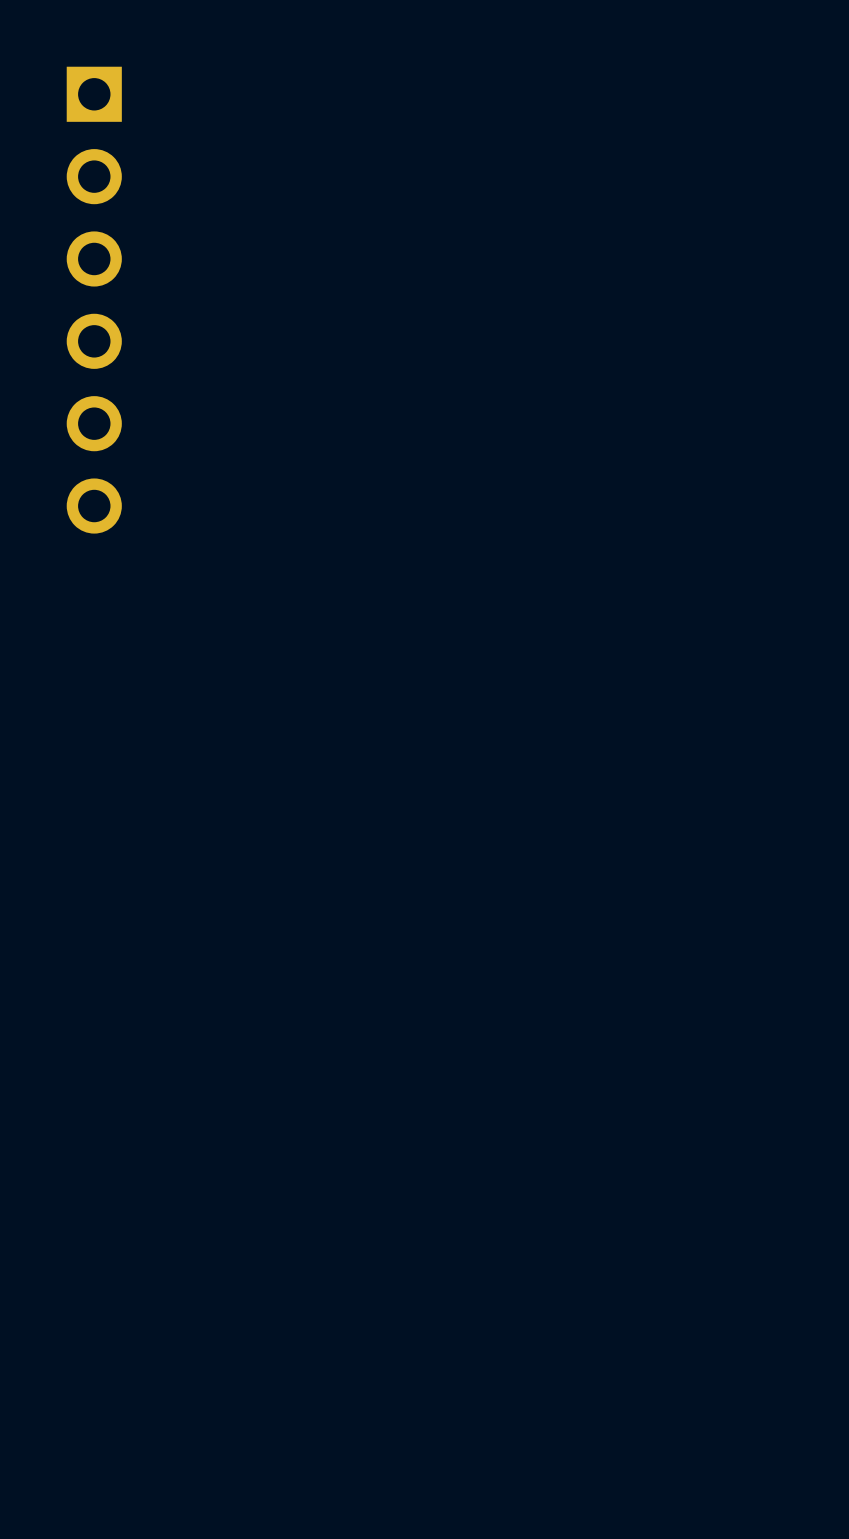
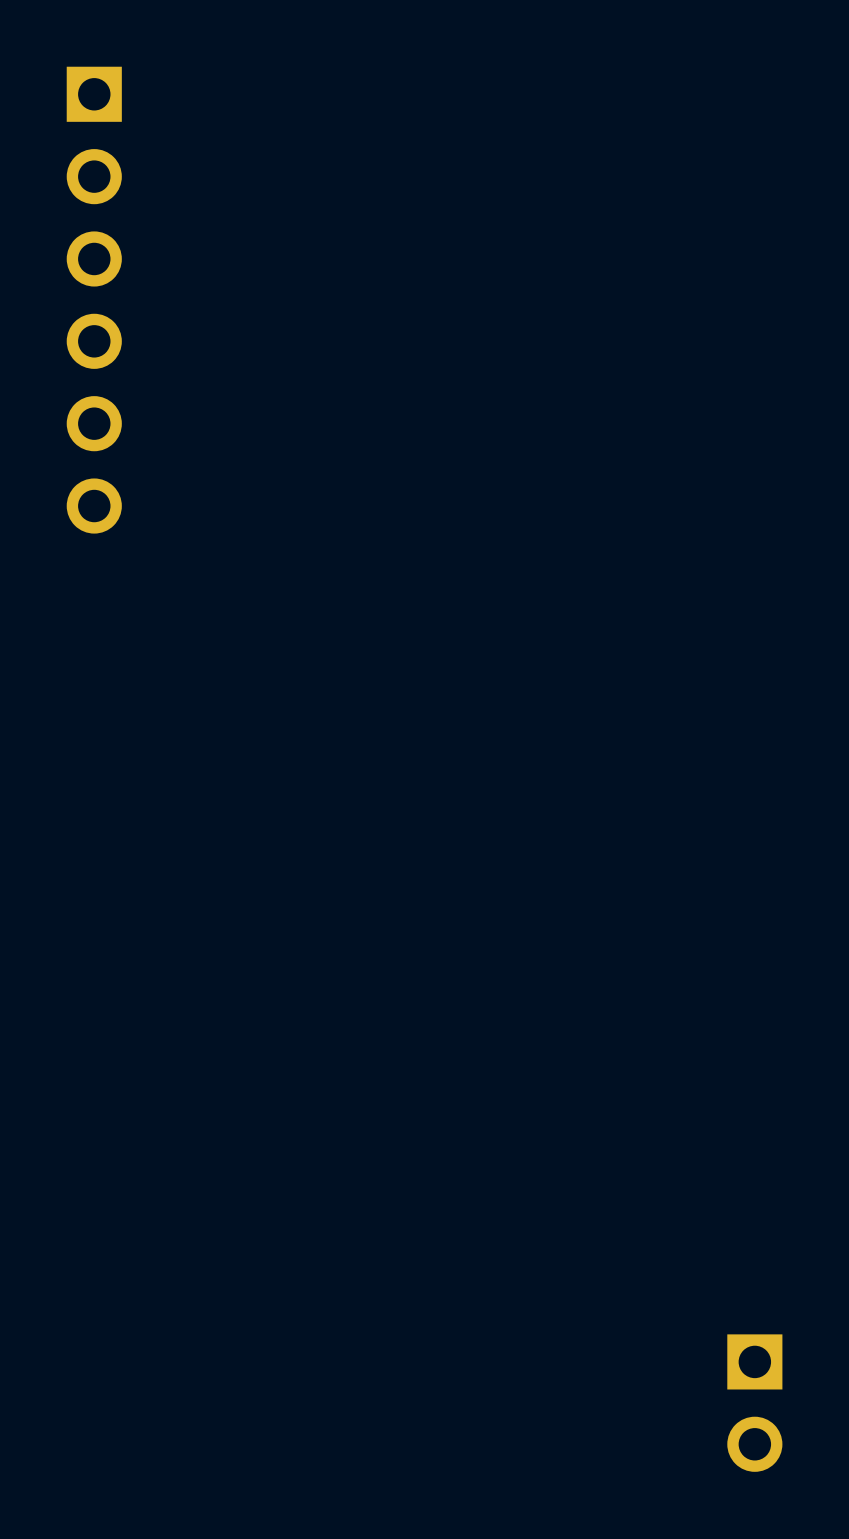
part: none -> (754, 1403)

